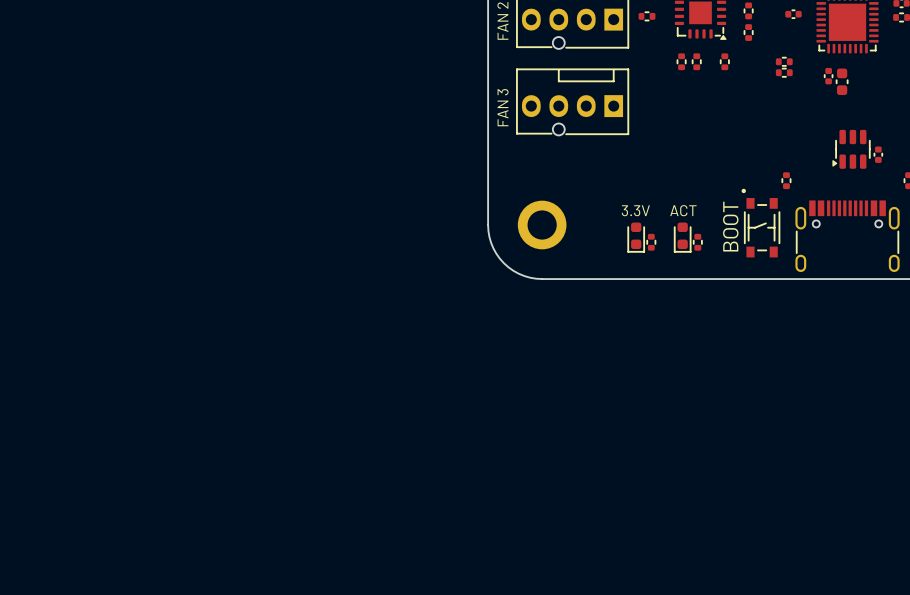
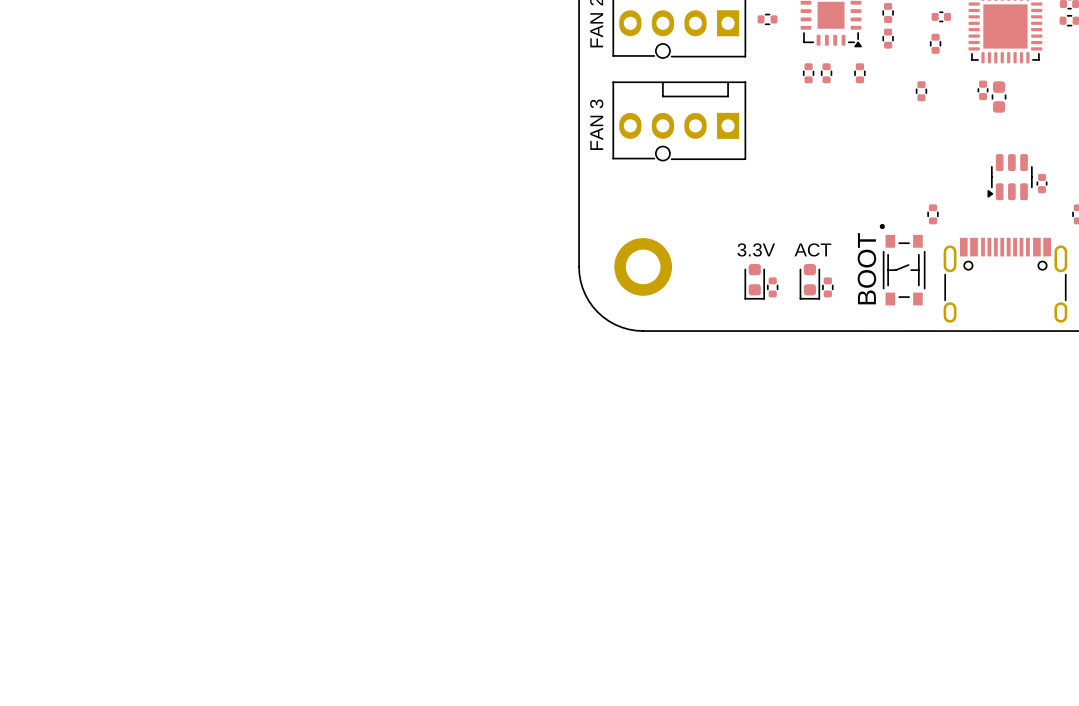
part: none -> (935, 43)
part: (784, 61) -> none
part: (784, 72) -> none
part: none -> (921, 91)

